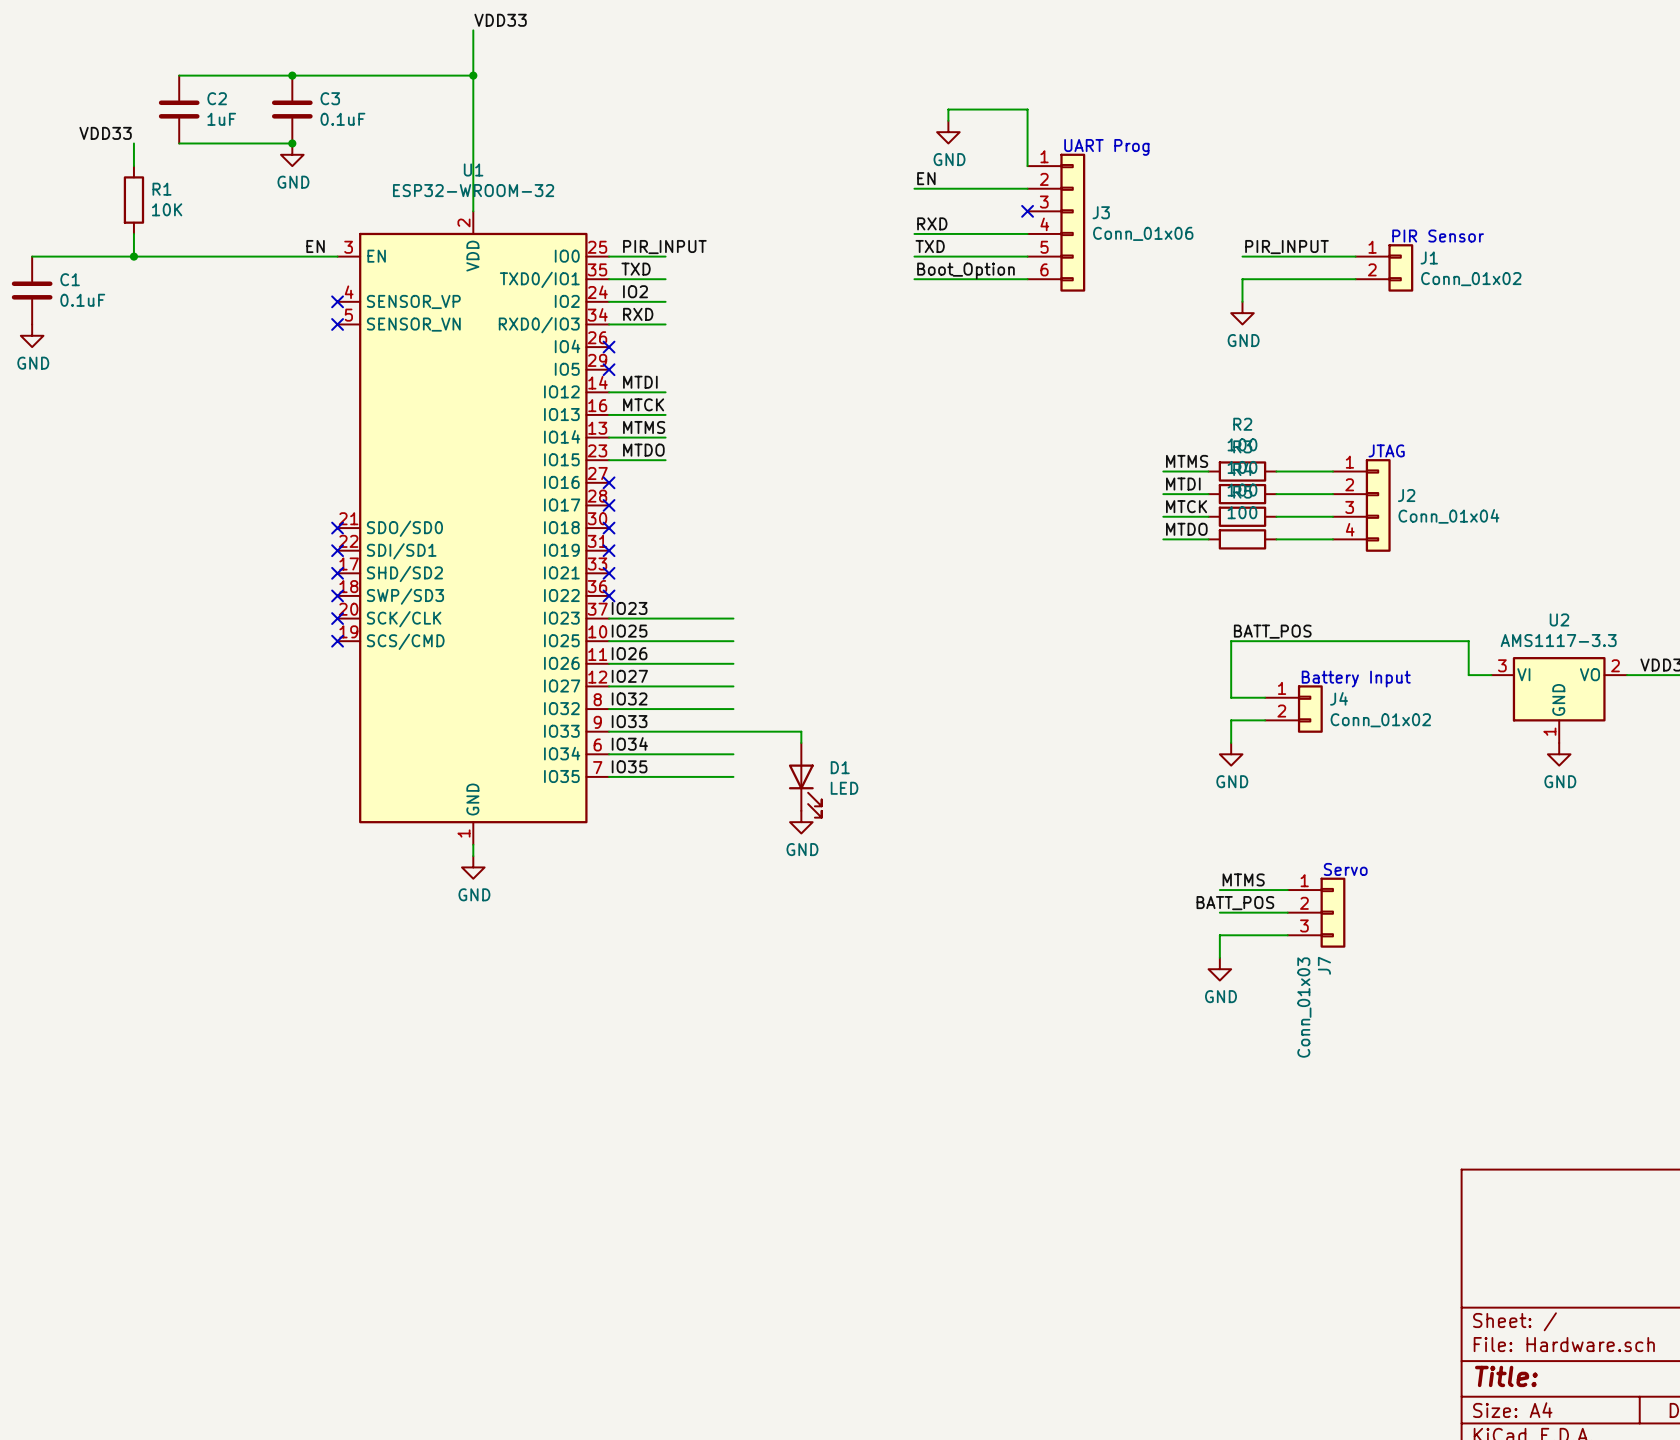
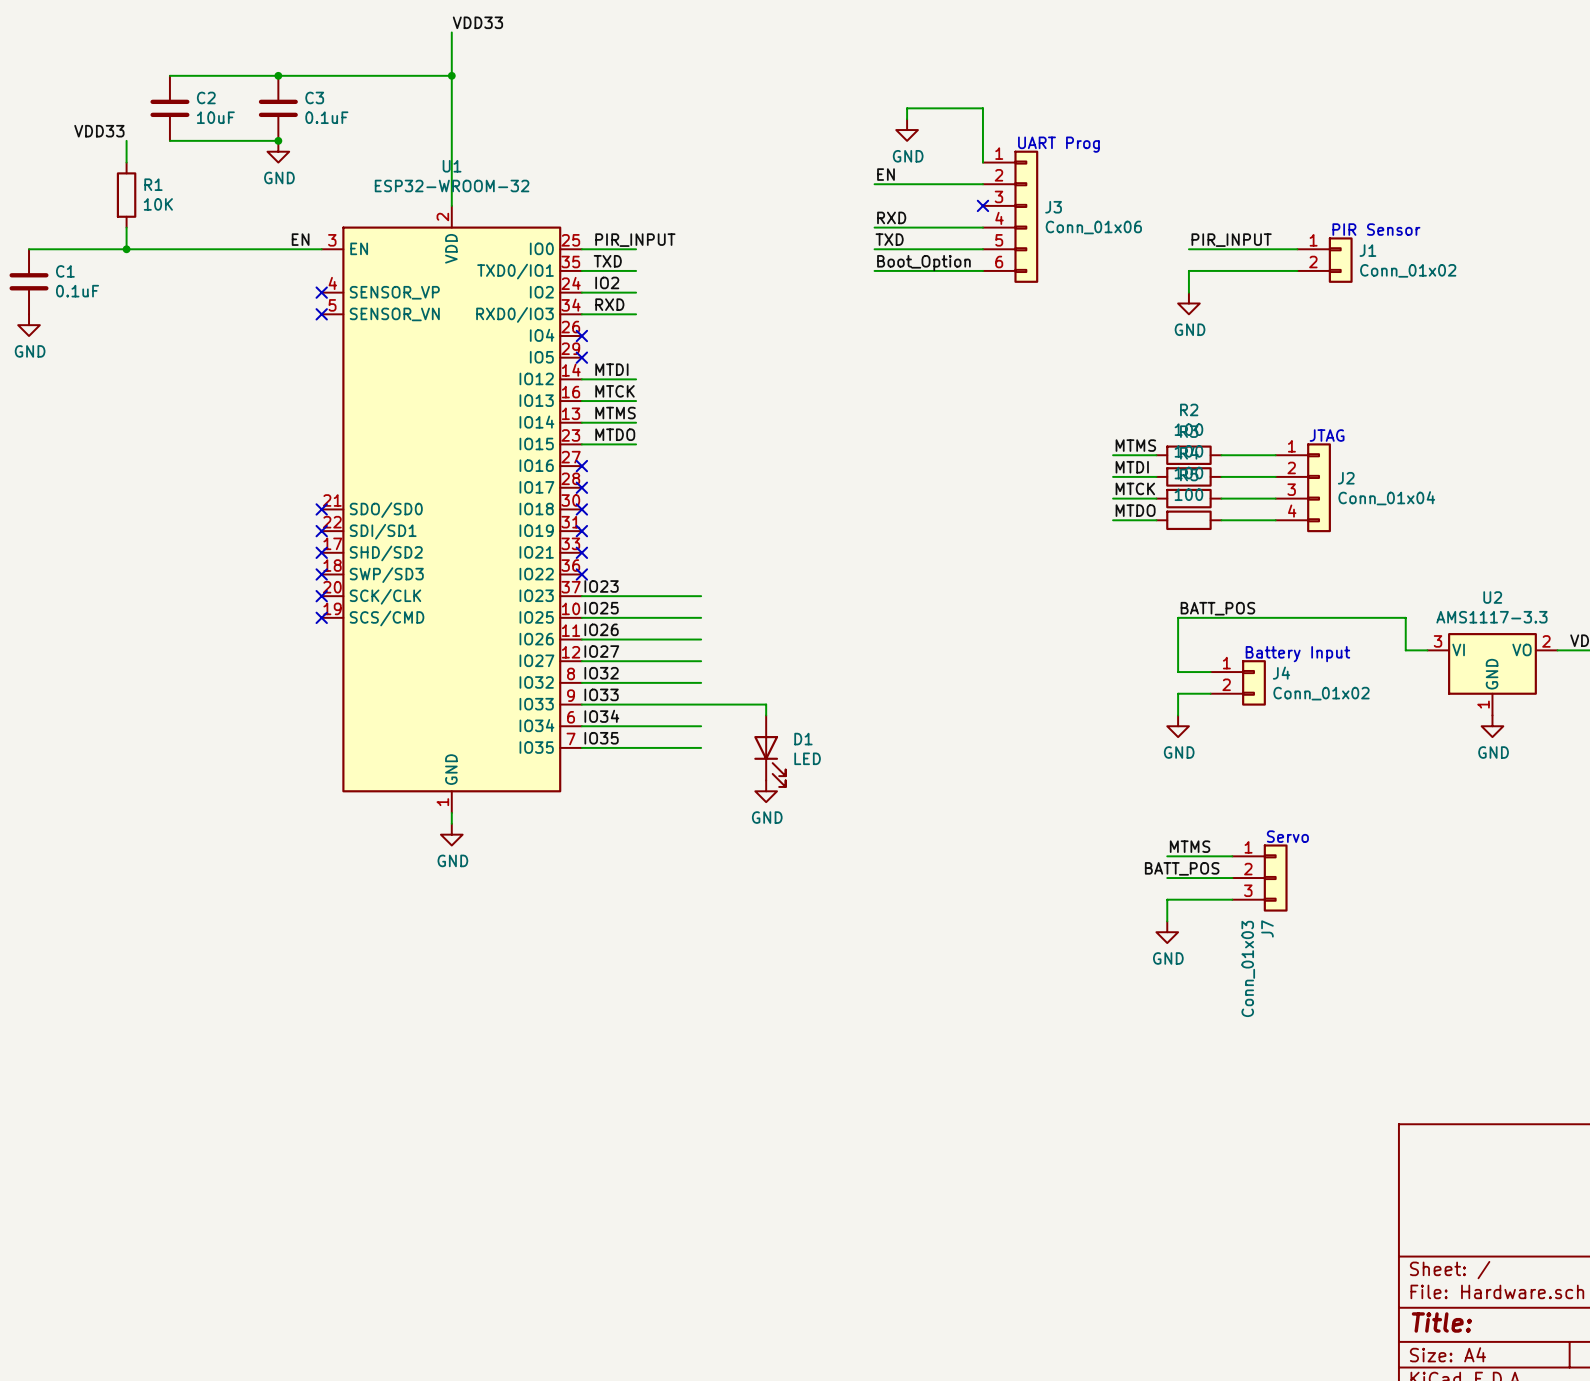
C2 value: 1uF (221, 119) -> 10uF (215, 117)

